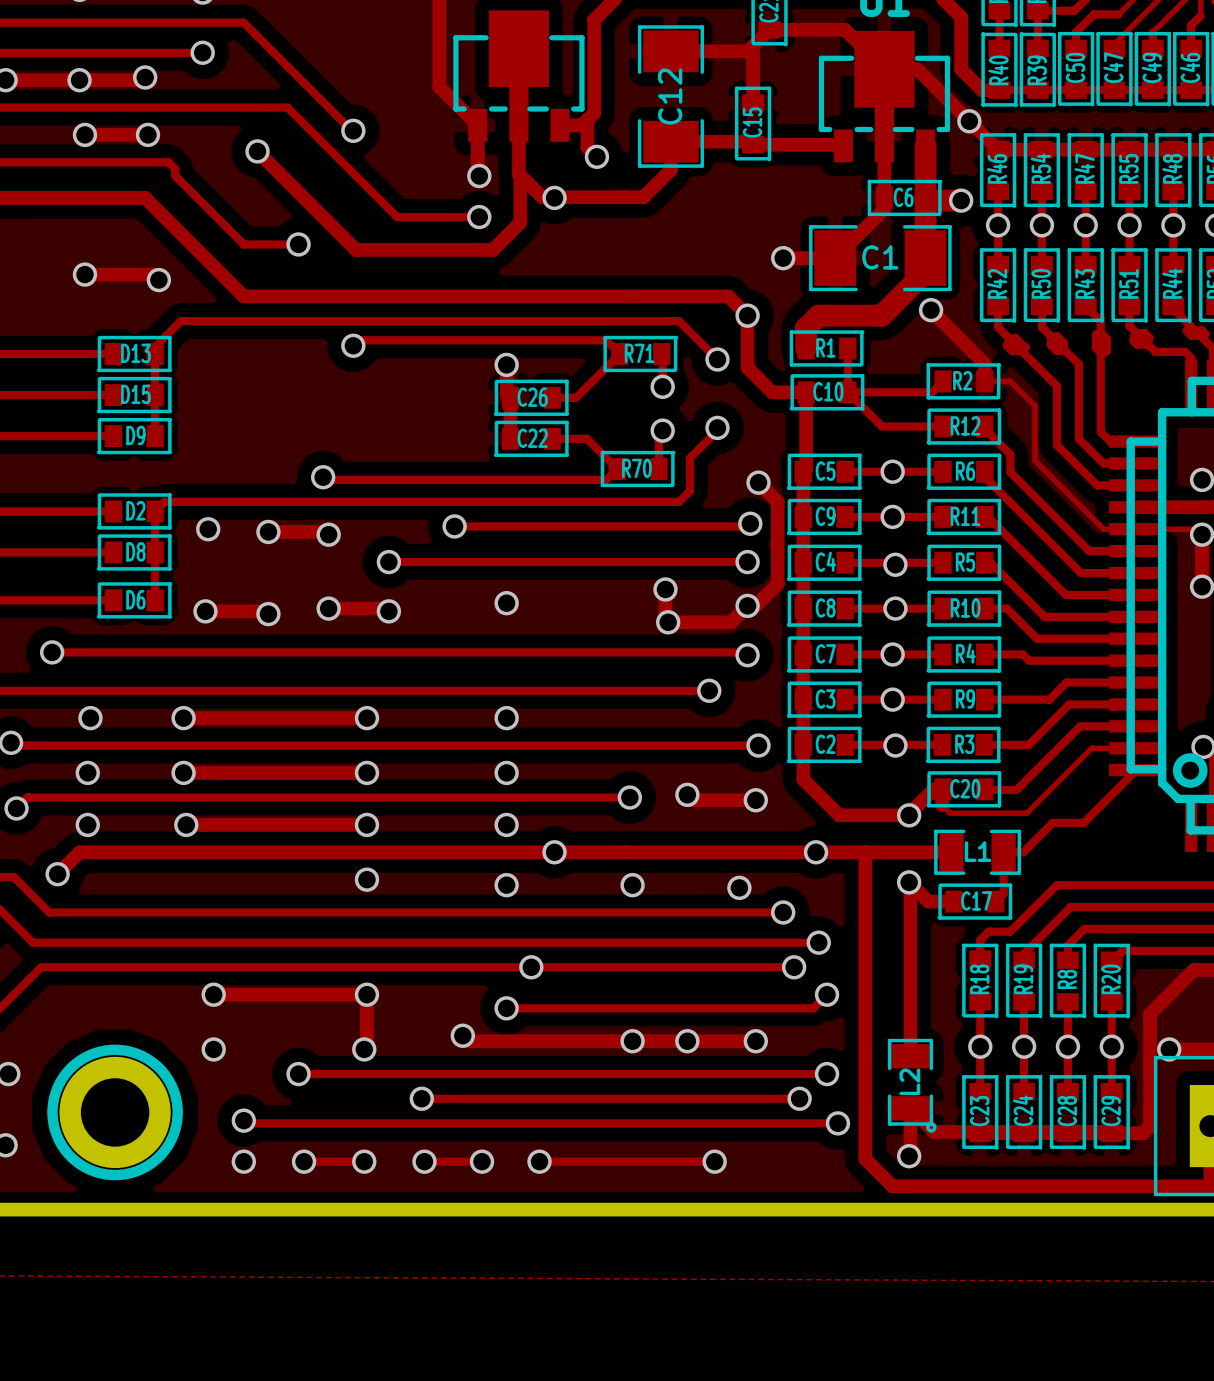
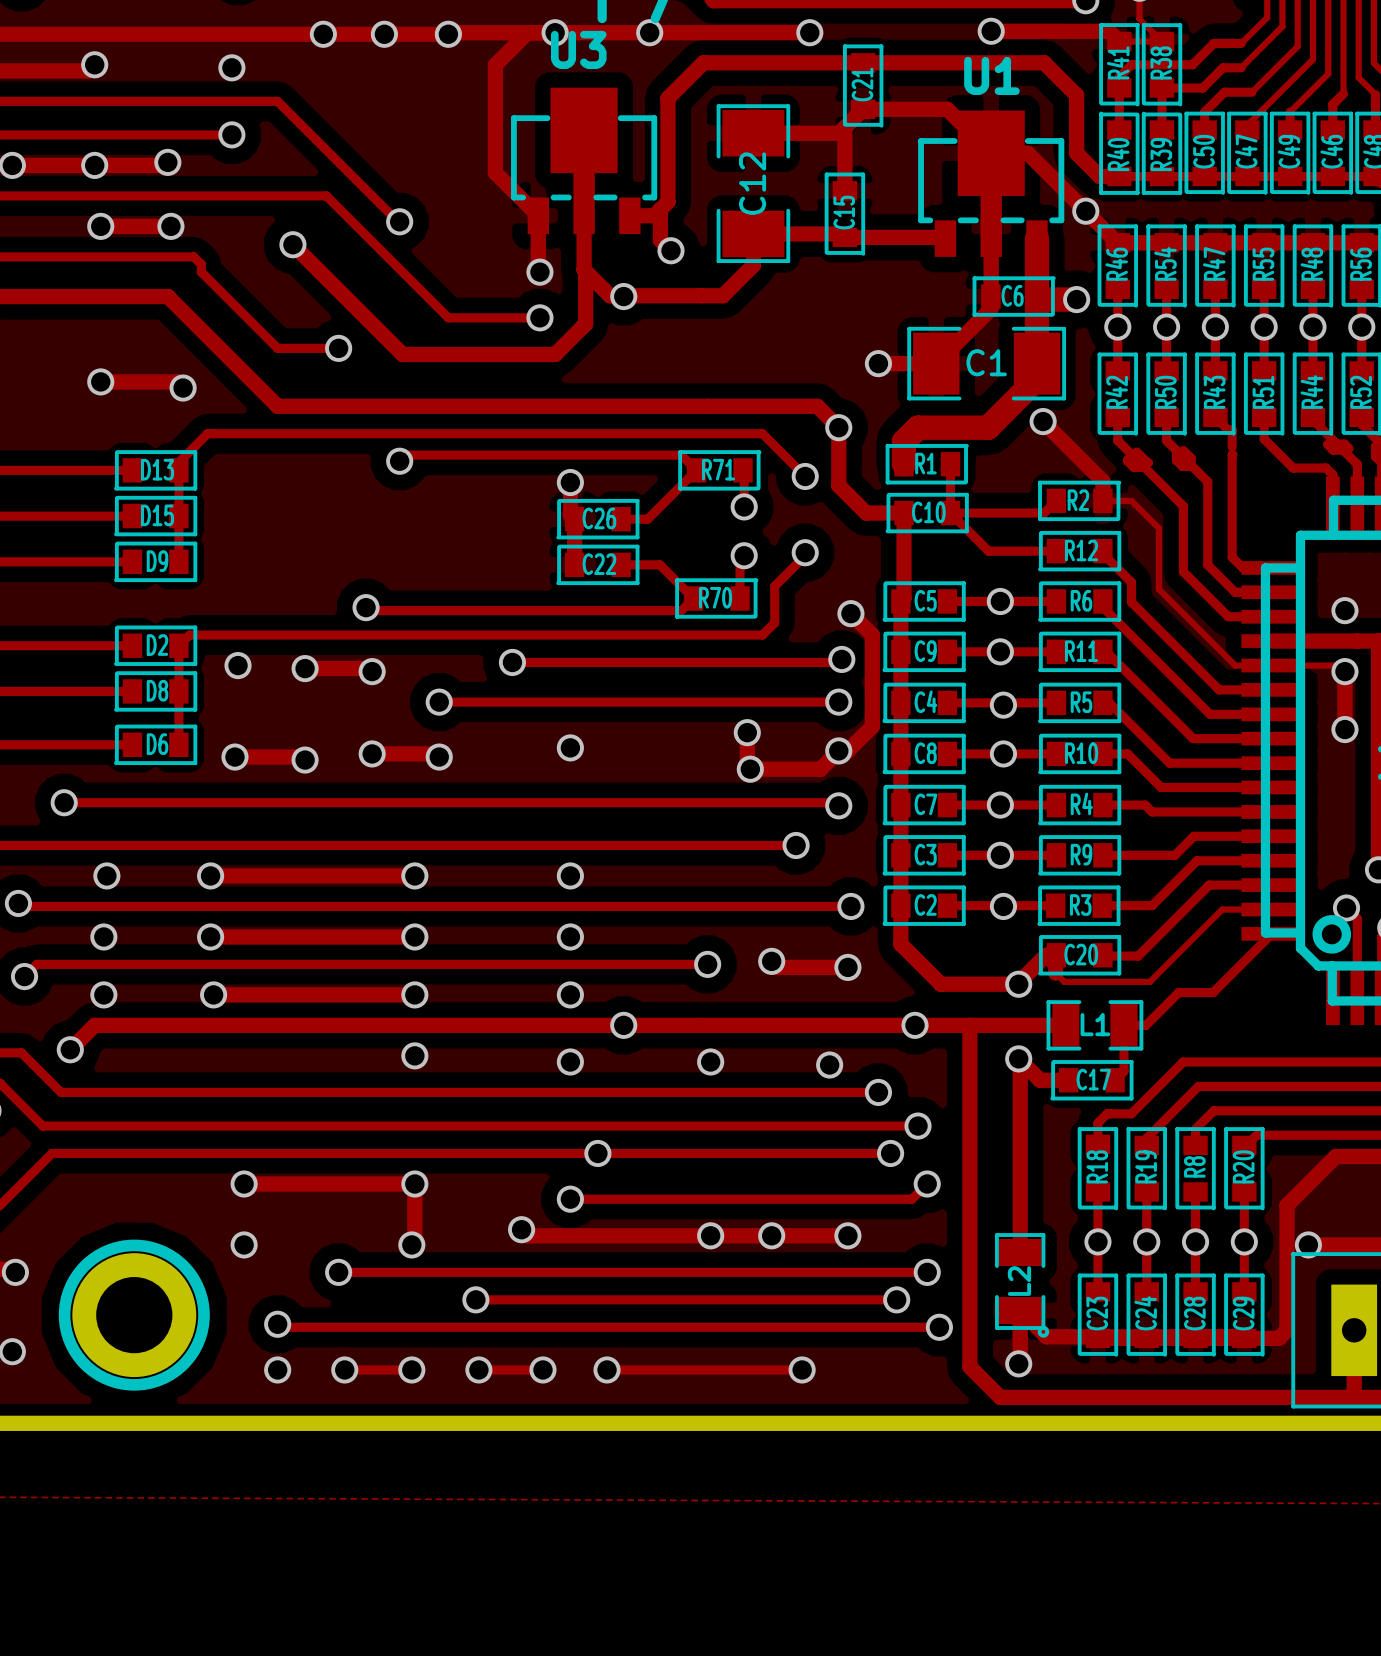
track: (1100, 332) (1106, 338) (1106, 350) (1104, 352) (1100, 352) (1096, 347) (1096, 334) -> none
track: (1136, 333) (1144, 333) (1149, 339) -> none
track: (1133, 336) (1133, 340) (1137, 344) (1148, 344) -> none

